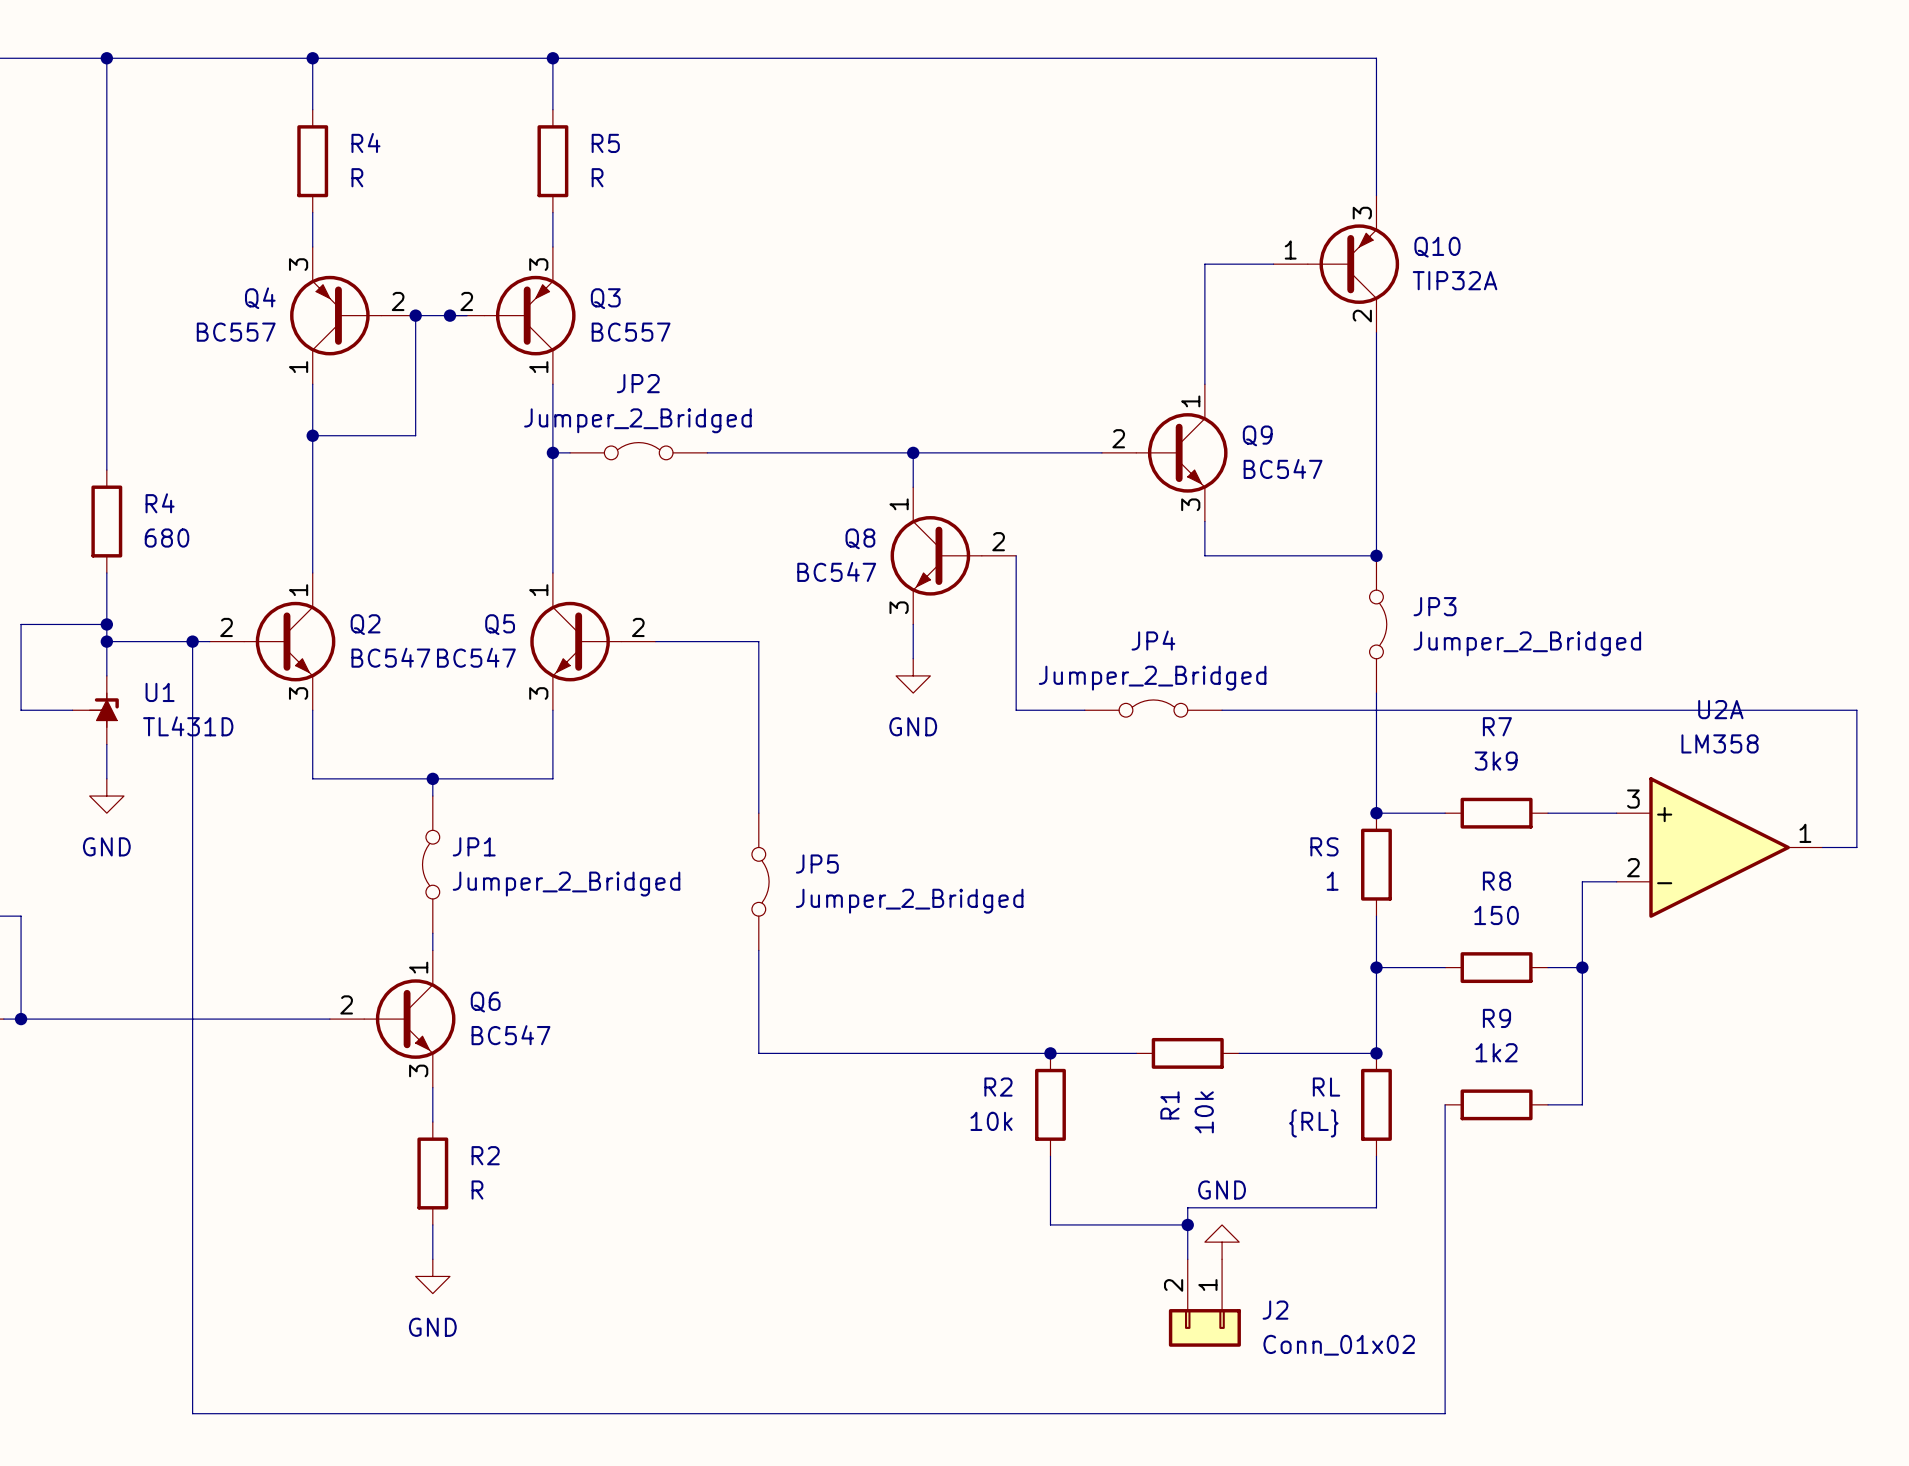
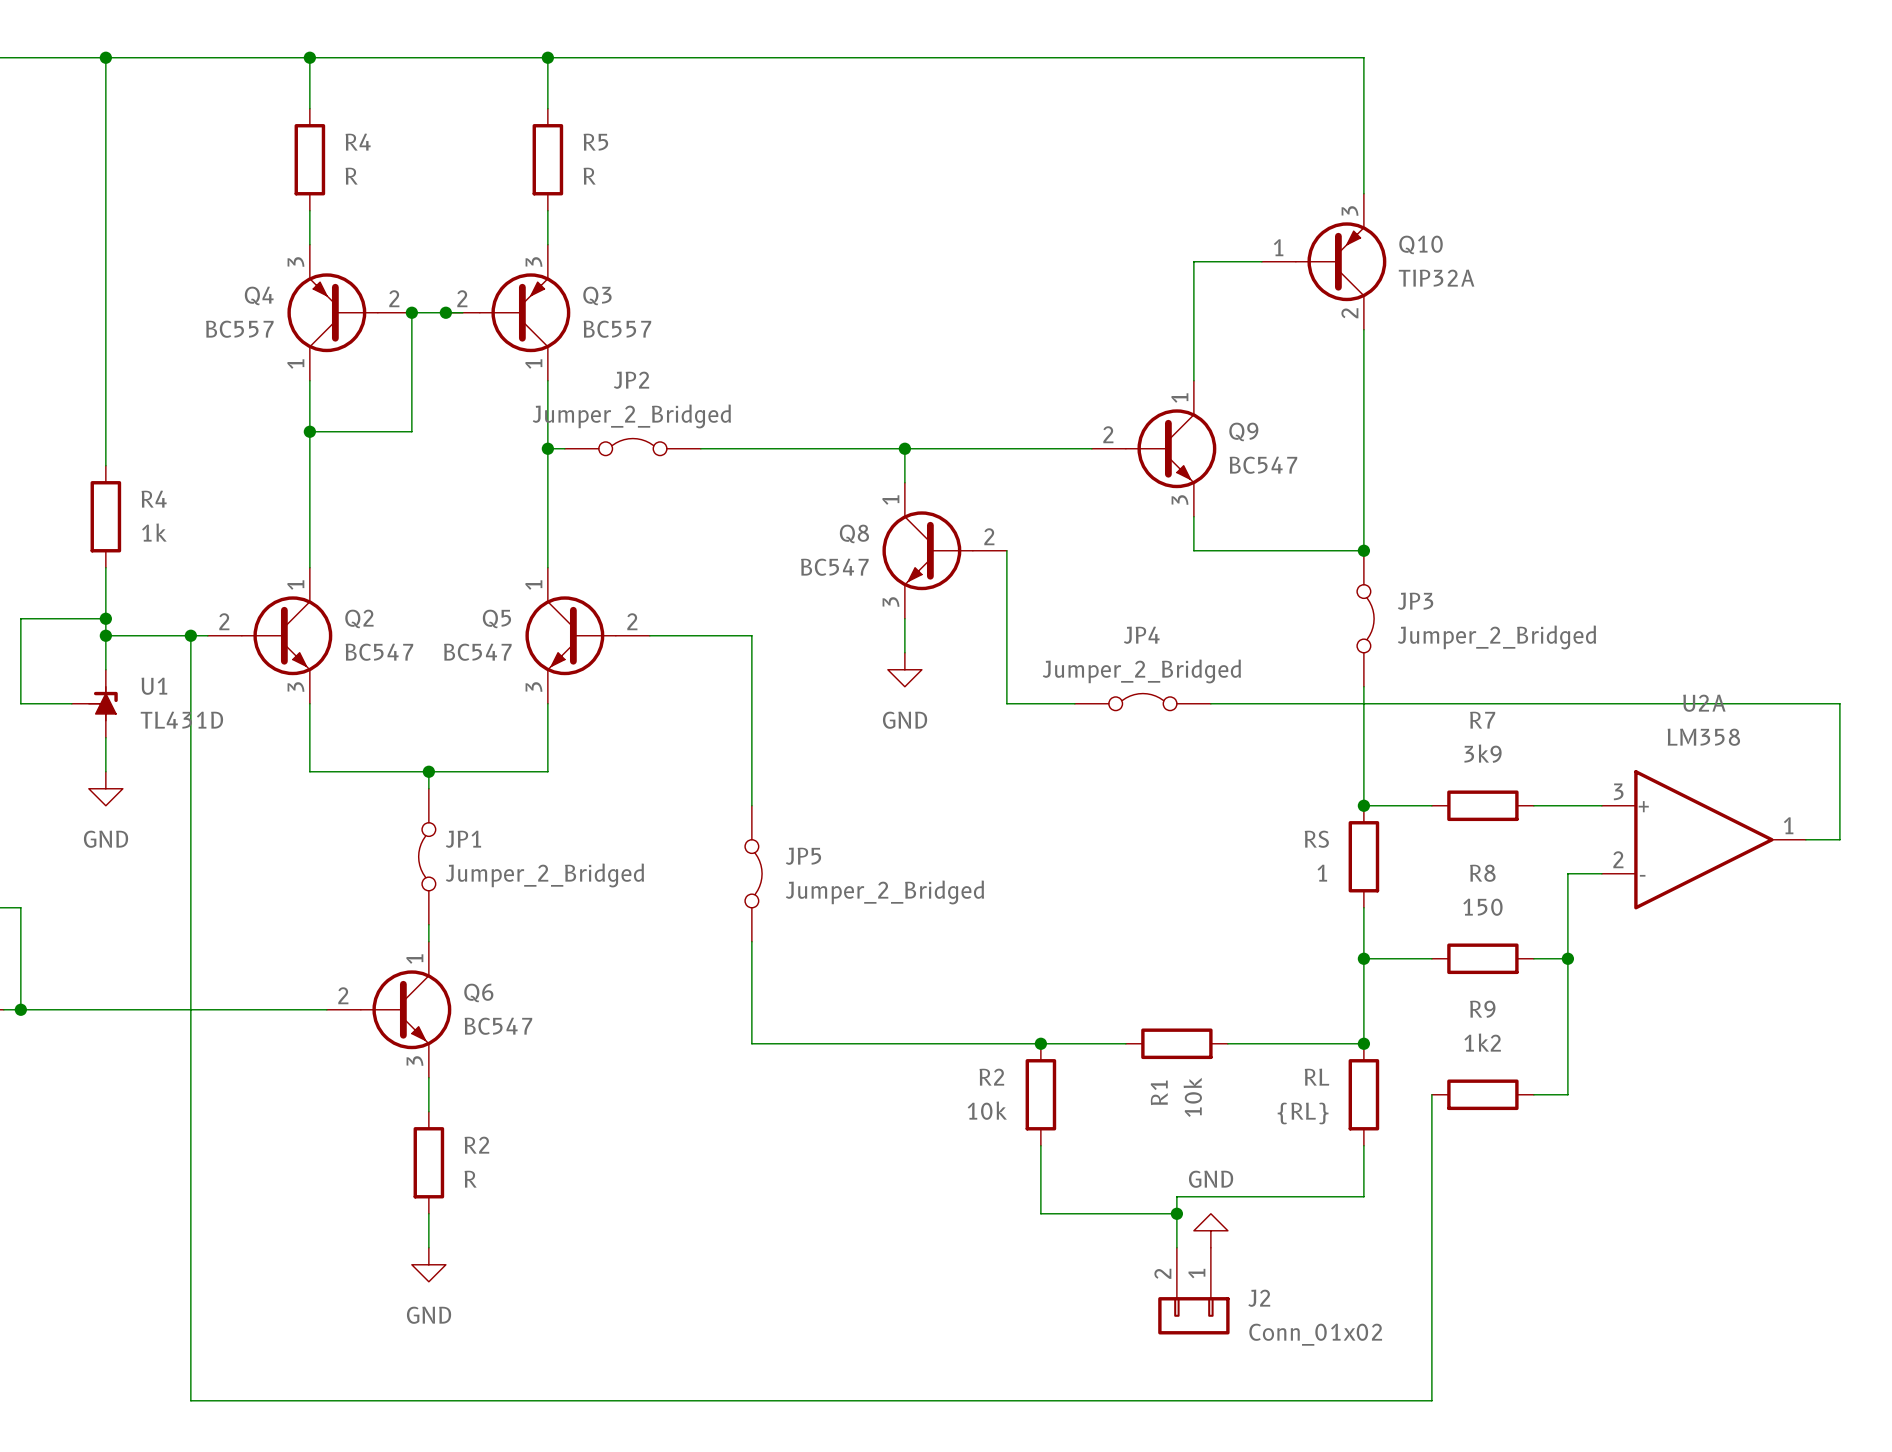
R4 value: 680 (167, 538) -> 1k (154, 532)

